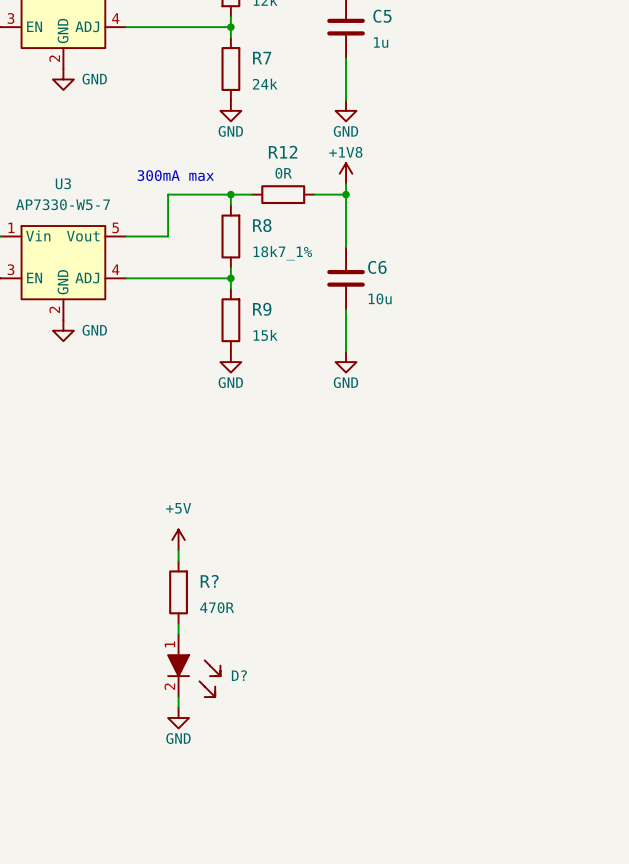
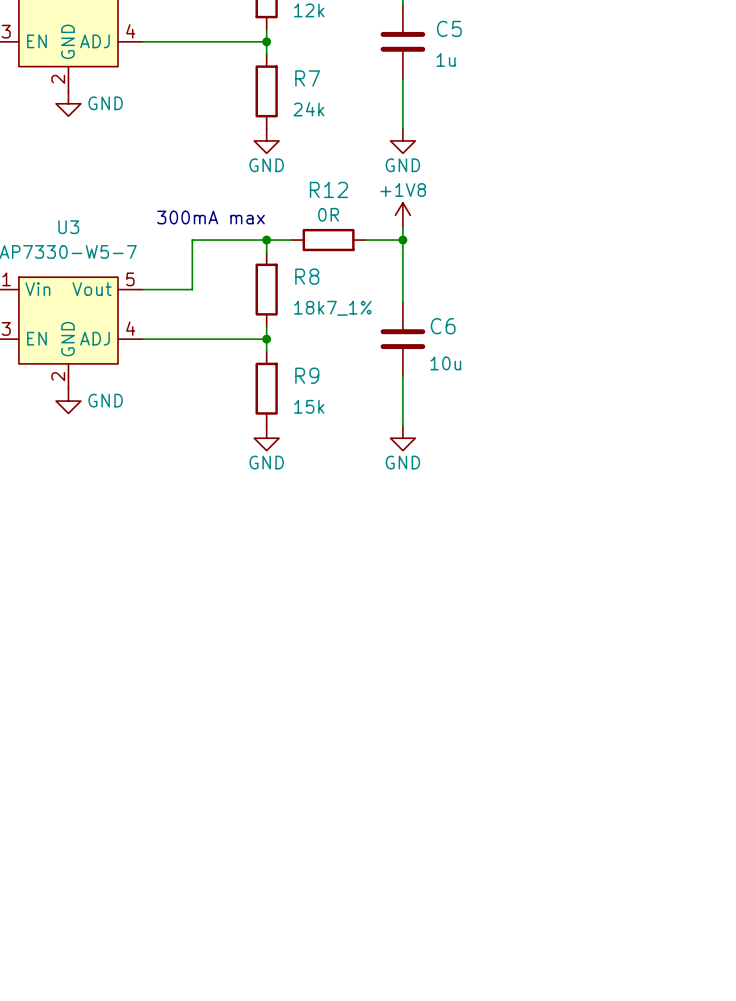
power symbol: +5V (178, 540) -> none
wire: (178, 550) (178, 560) -> none
R?: (178, 592) -> none
wire: (178, 623) (178, 634) -> none
D?: (194, 665) -> none
wire: (178, 697) (178, 707) -> none
power symbol: GND (178, 717) -> none

